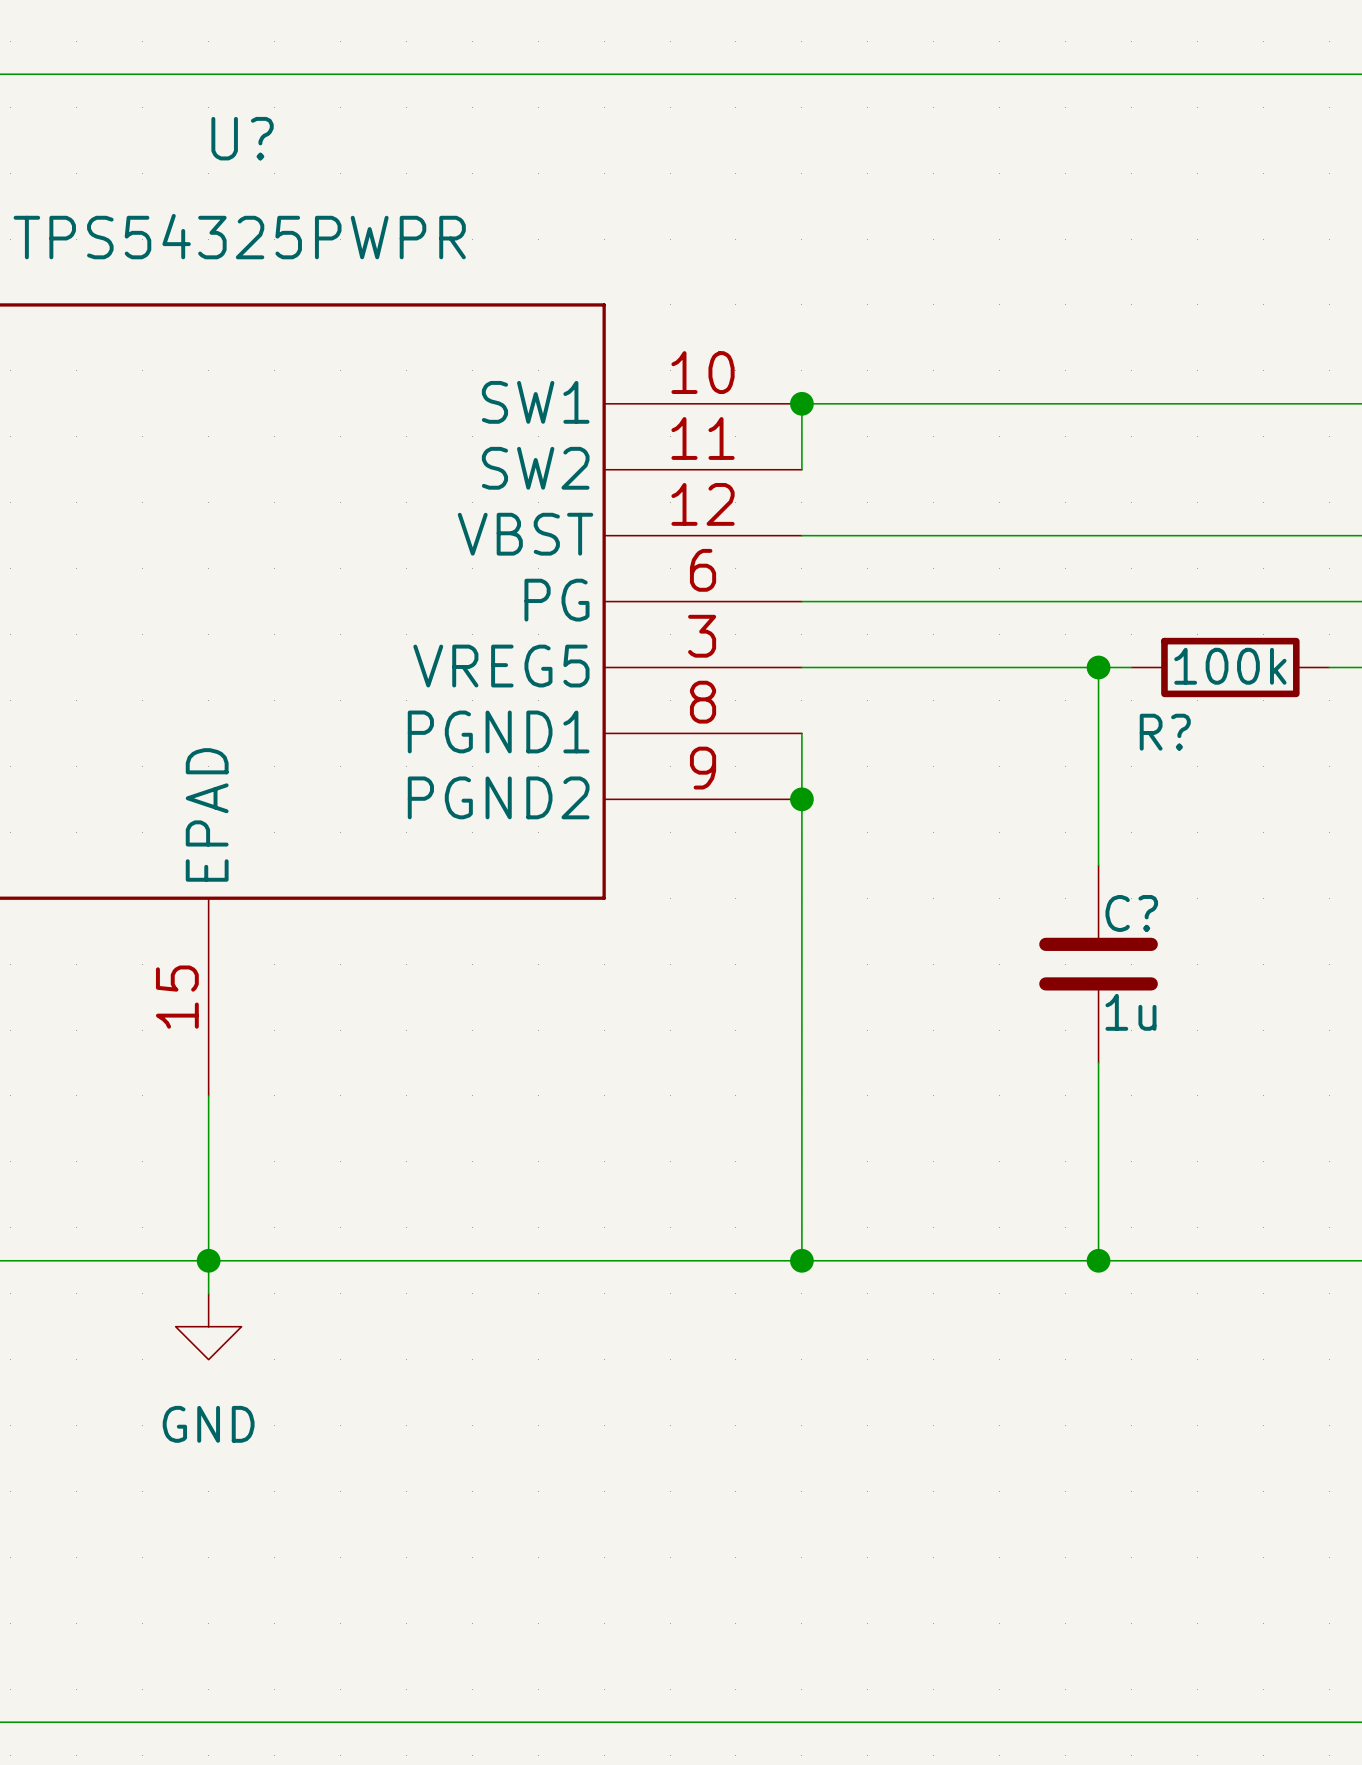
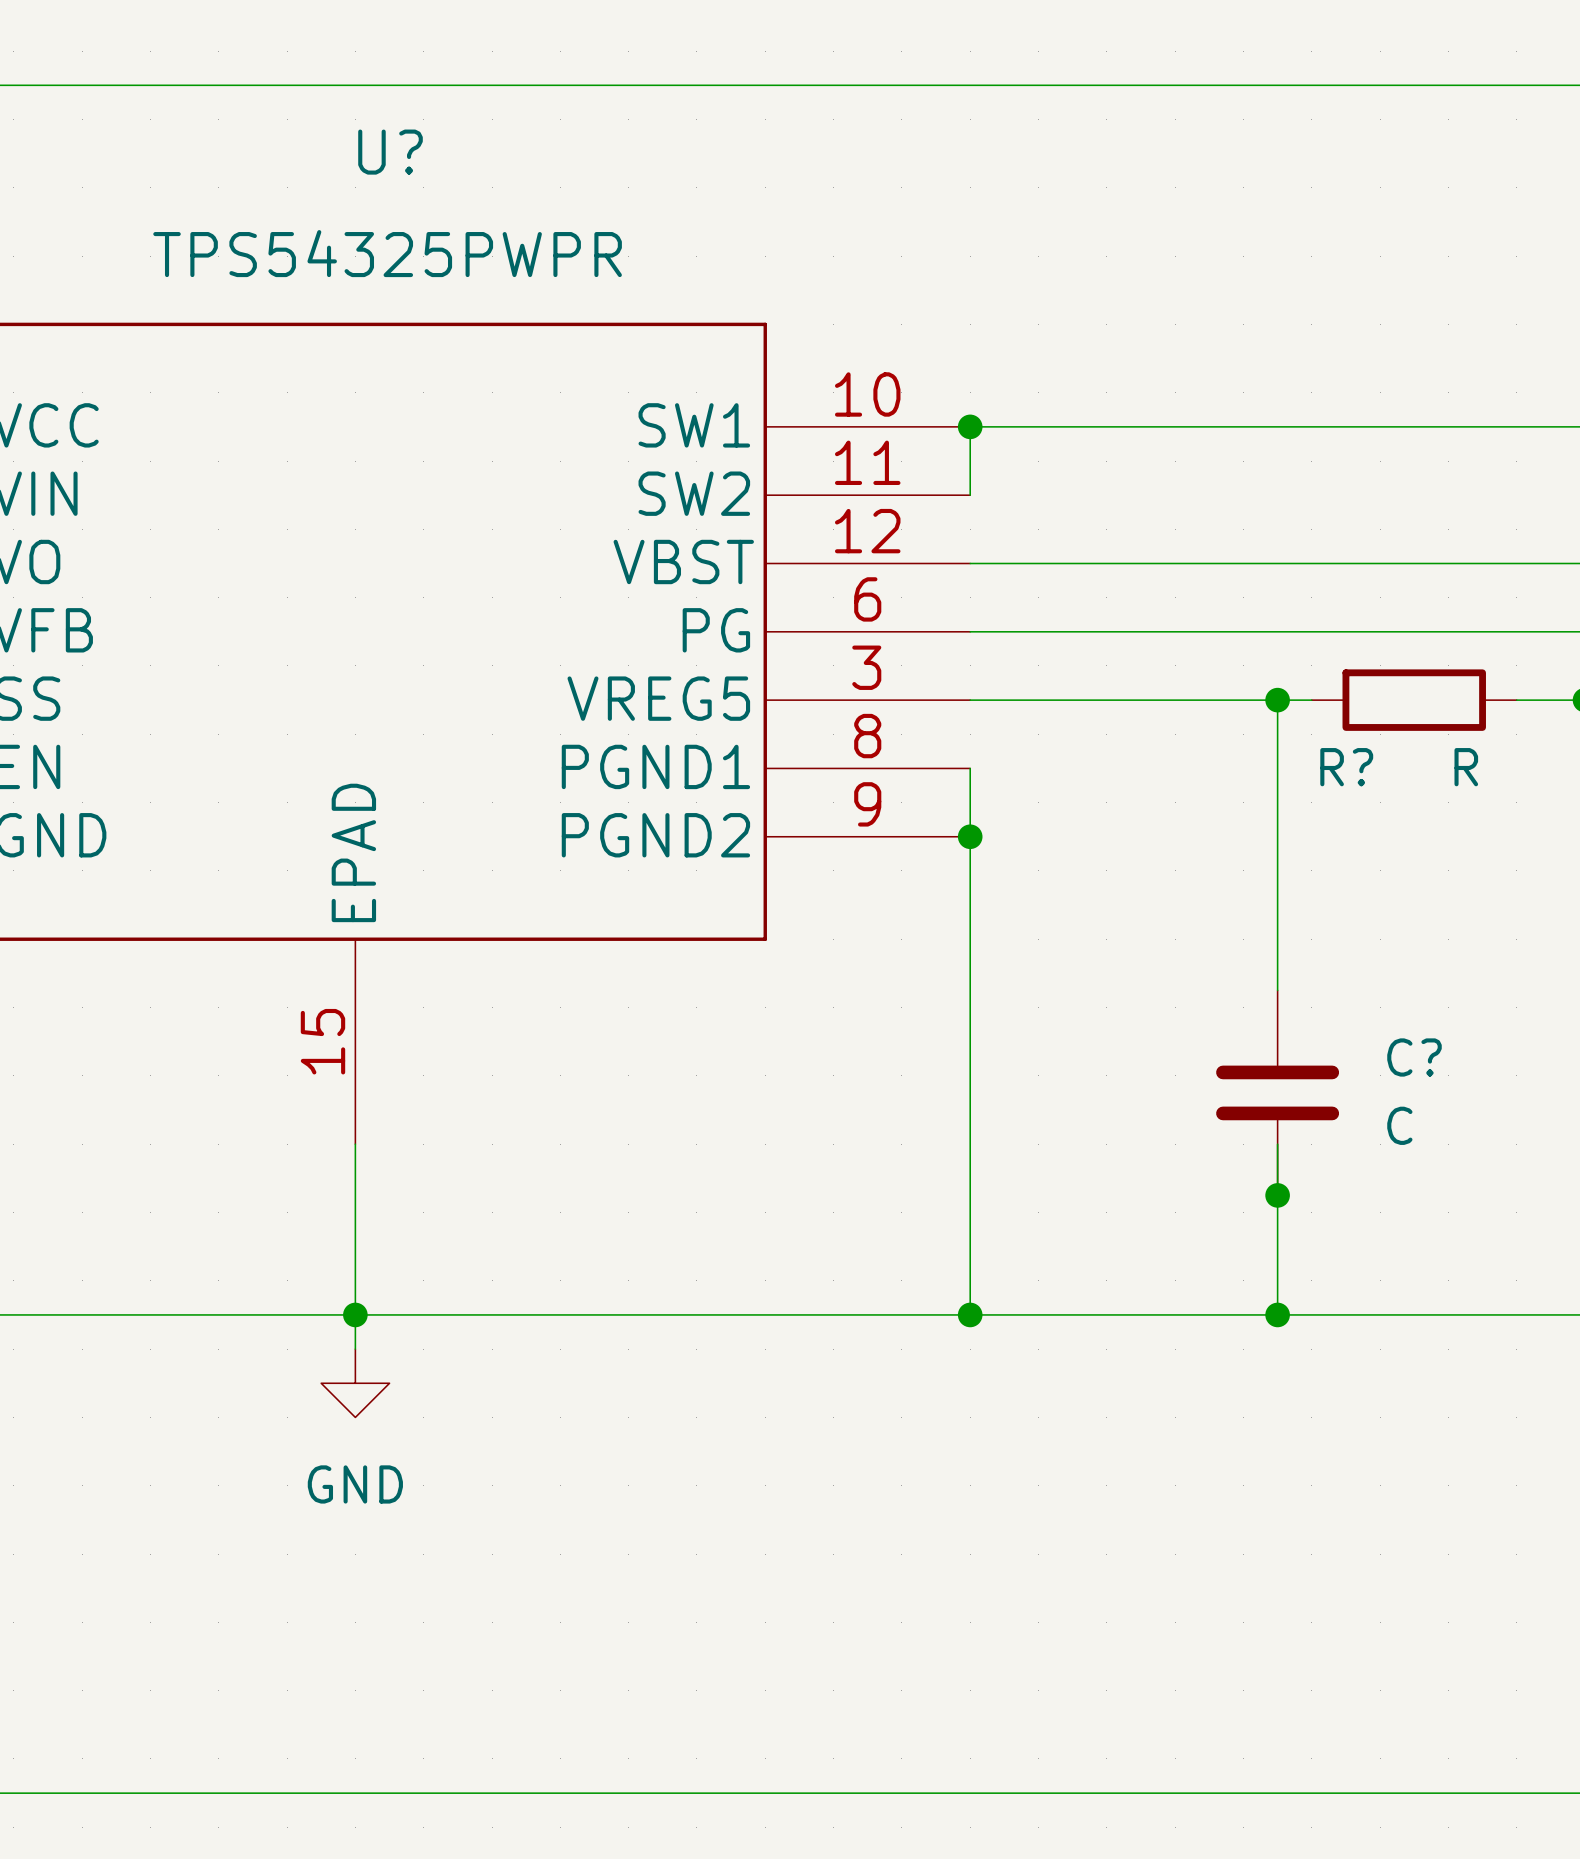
R? value: 100k (1230, 666) -> R (1466, 767)
C?: 1u (1098, 964) -> none
C?: none -> C (1277, 1092)
junction: none -> (1277, 1195)

